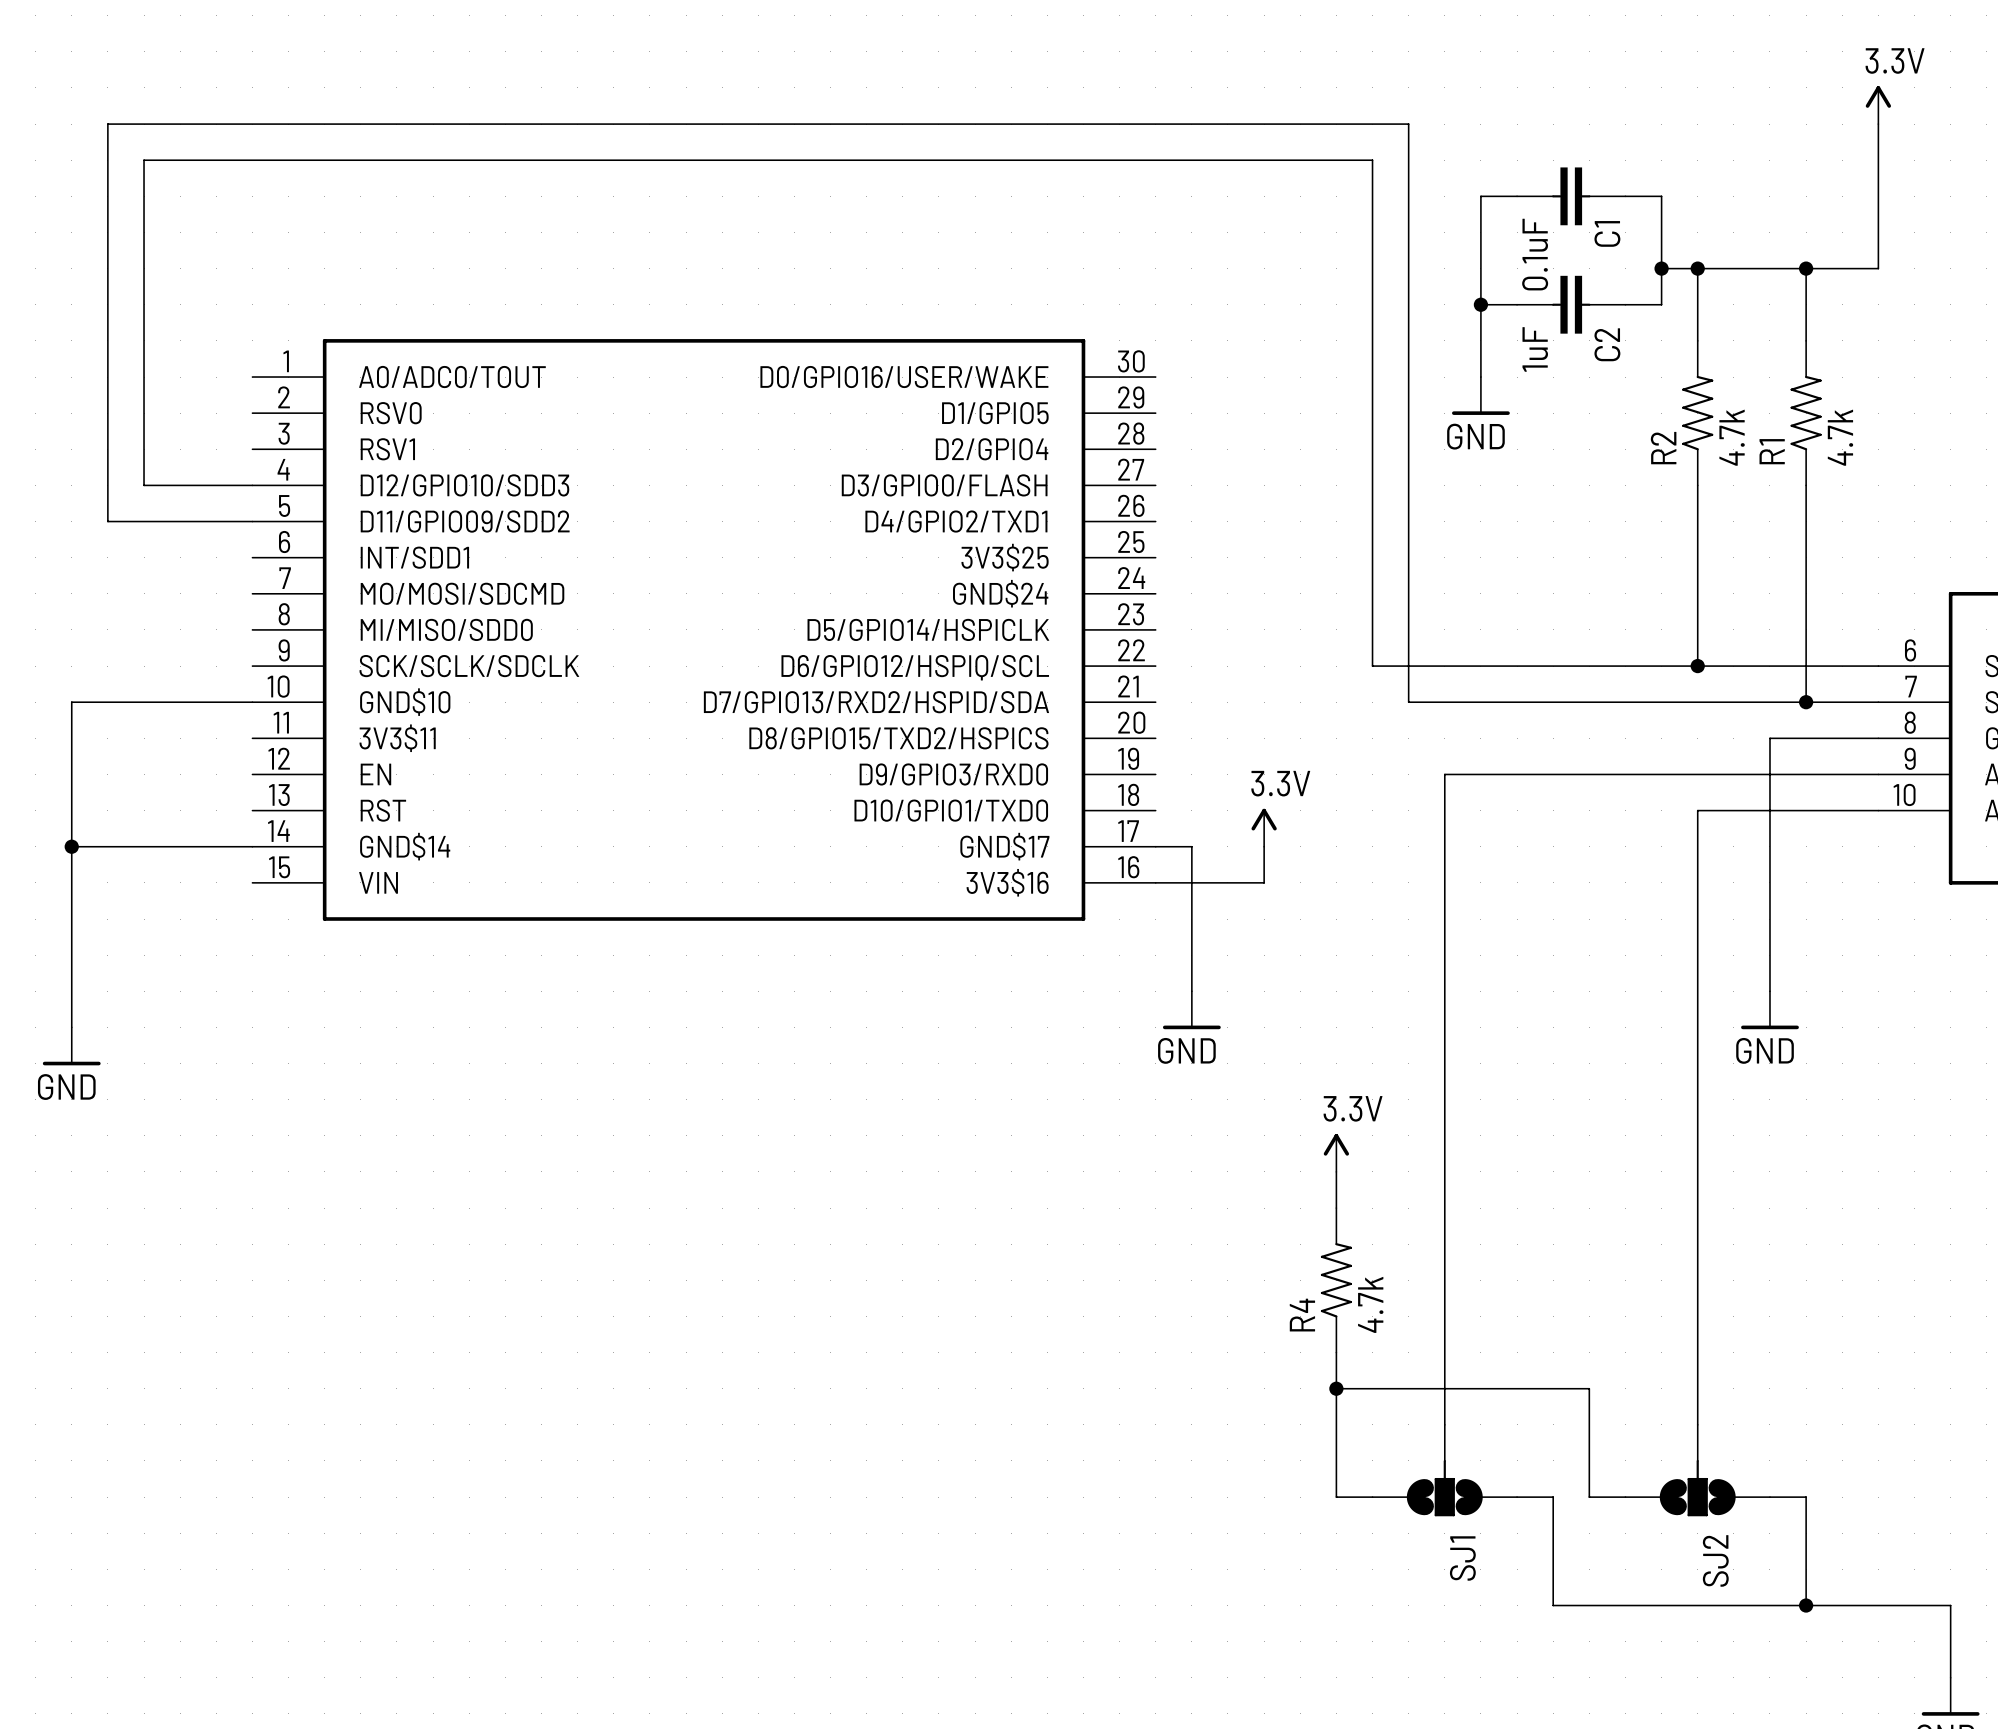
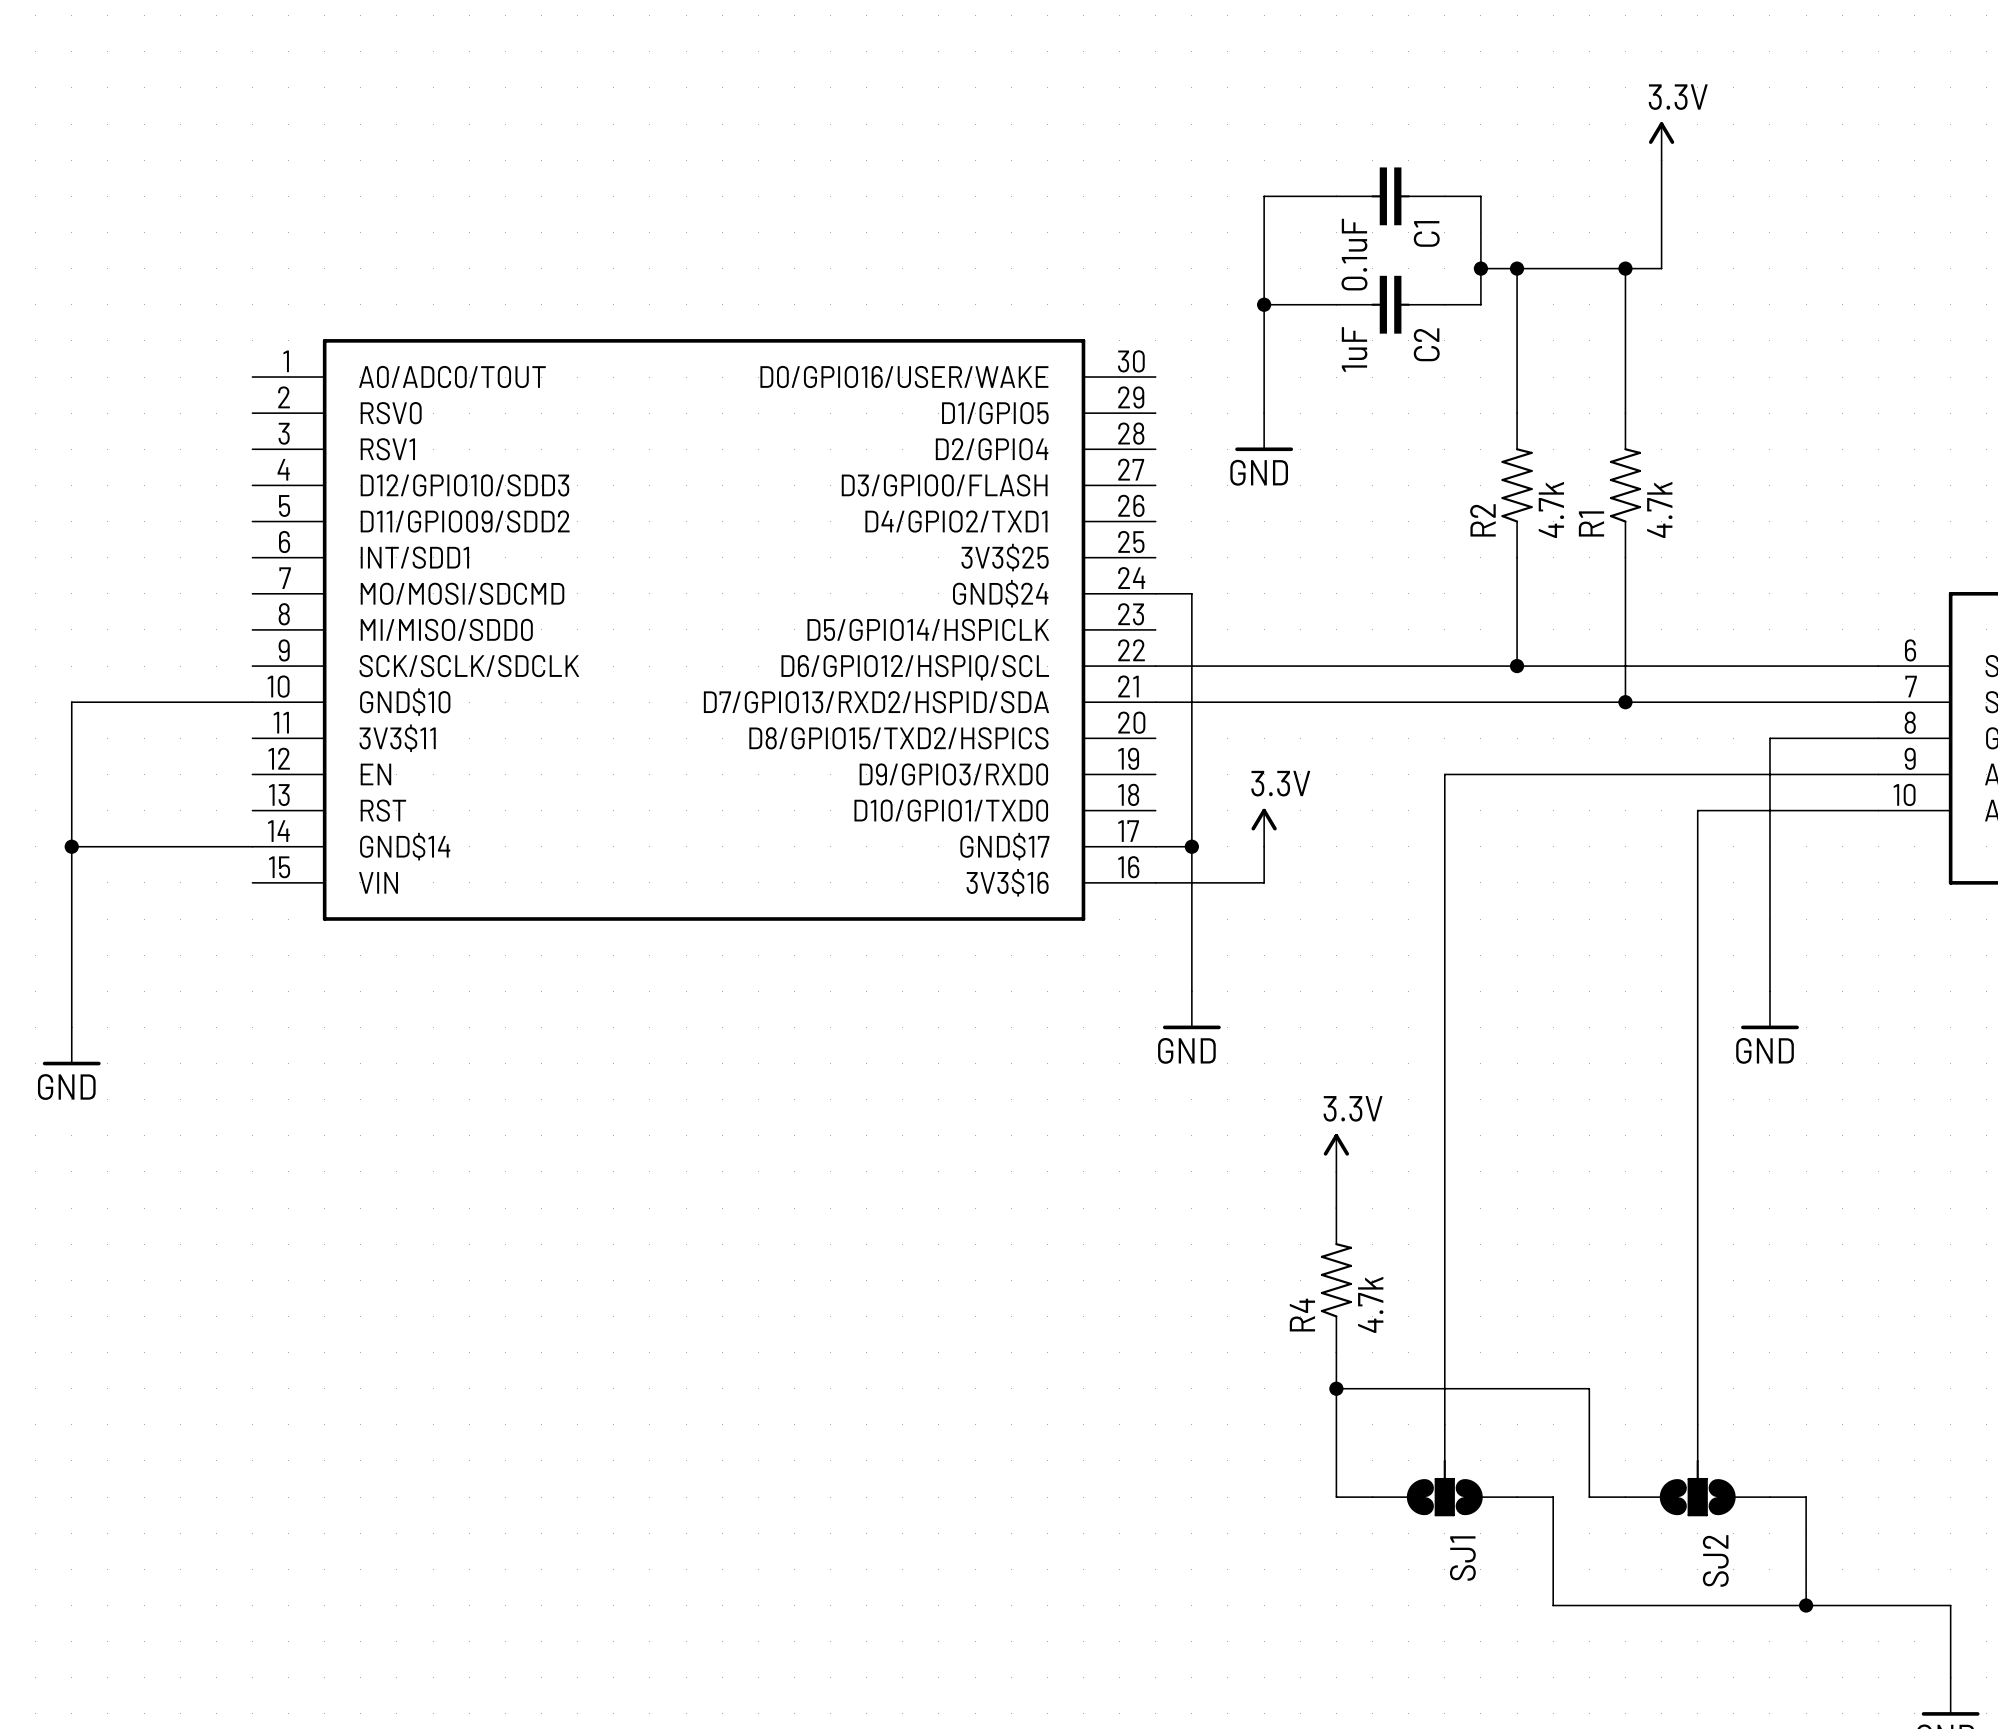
power symbol position: 3.3V (1878, 105) -> 3.3V (1661, 141)
wire: (1878, 124) (1878, 268) (1661, 268) (1661, 304) (1625, 304) -> none
wire: none -> (1336, 196) (1264, 196) (1264, 413)
wire: (1480, 196) (1517, 196) -> (1480, 196) (1444, 196)
C1 position: (1571, 196) -> (1390, 196)
wire: (1625, 196) (1661, 196) -> (1661, 160) (1661, 196)
wire: none -> (1480, 268) (1661, 268)
junction: none -> (1480, 268)
wire: none -> (1517, 268) (1517, 413)
junction: none -> (1517, 268)
wire: none -> (1625, 268) (1625, 413)
junction: none -> (1625, 268)
junction: (1661, 268) -> none
wire: (1697, 268) (1697, 340) -> none
junction: (1697, 268) -> none
wire: (1806, 268) (1806, 340) -> none
junction: (1806, 268) -> none
wire: none -> (1264, 304) (1336, 304)
junction: none -> (1264, 304)
wire: none -> (1444, 304) (1480, 304)
junction: (1480, 304) -> none
wire: (1517, 304) (1480, 304) (1480, 377) -> none
C2 position: (1571, 304) -> (1390, 304)
power symbol position: GND (1480, 395) -> GND (1264, 432)
R2 position: (1697, 413) -> (1517, 485)
R1 position: (1806, 413) -> (1625, 485)
wire: (252, 485) (144, 485) (144, 160) (1372, 160) (1372, 666) -> (1155, 666) (1372, 666)
wire: (1697, 485) (1697, 666) -> none
wire: (1806, 485) (1806, 702) -> none
wire: (252, 521) (107, 521) (107, 124) (1408, 124) (1408, 702) -> (1155, 702) (1408, 702)
wire: none -> (1517, 557) (1517, 666)
wire: none -> (1625, 557) (1625, 702)
wire: none -> (1155, 593) (1191, 593) (1191, 846)
junction: none -> (1517, 666)
junction position: (1697, 666) -> (1625, 702)
junction: (1806, 702) -> none
junction: none -> (1191, 846)

